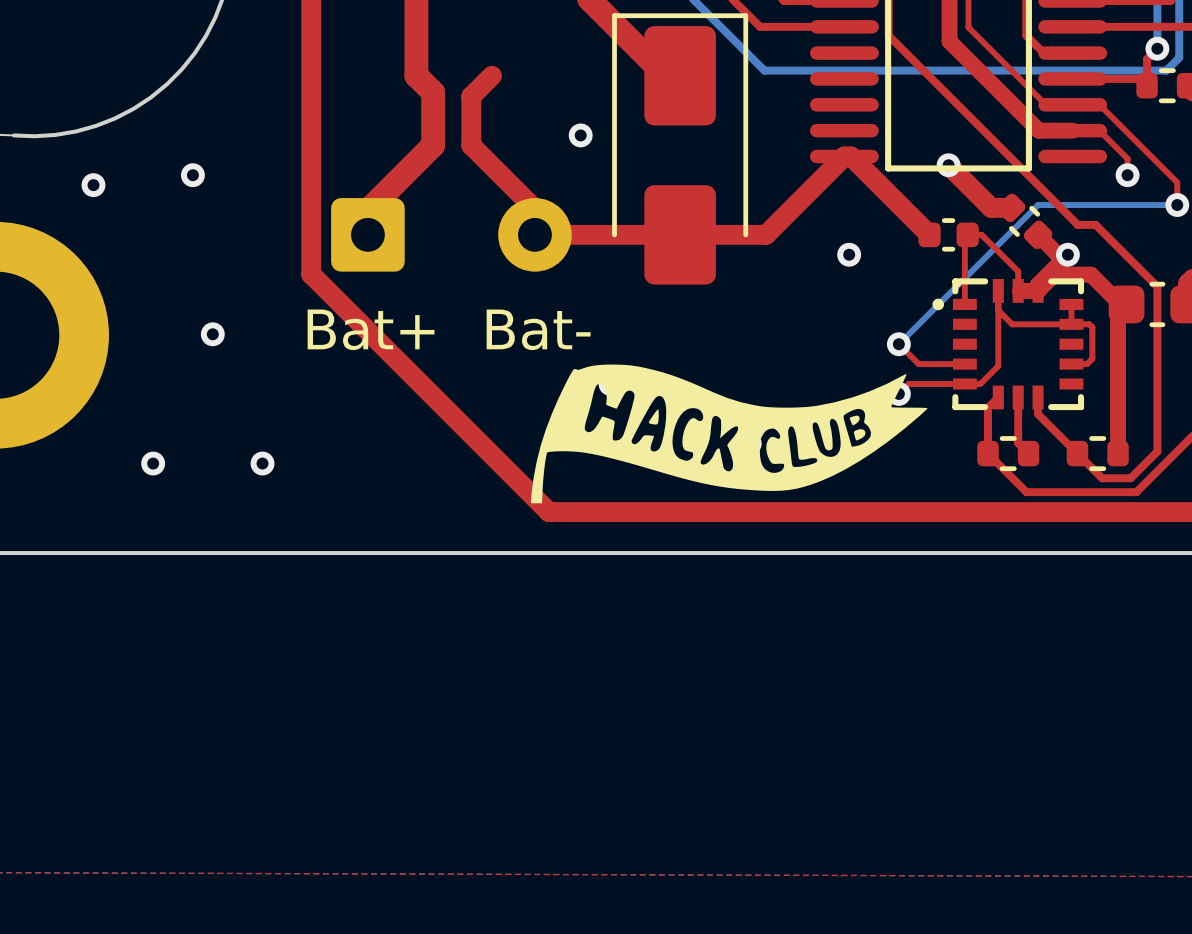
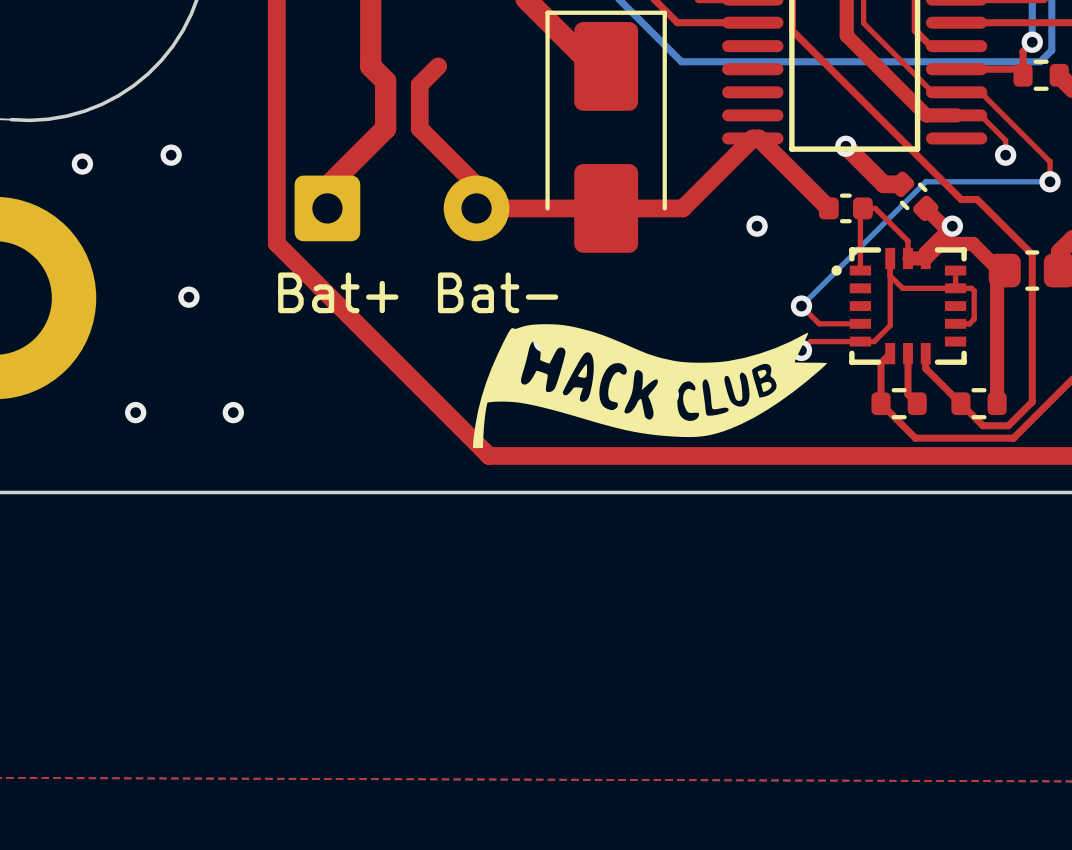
via: (580, 135) -> none

